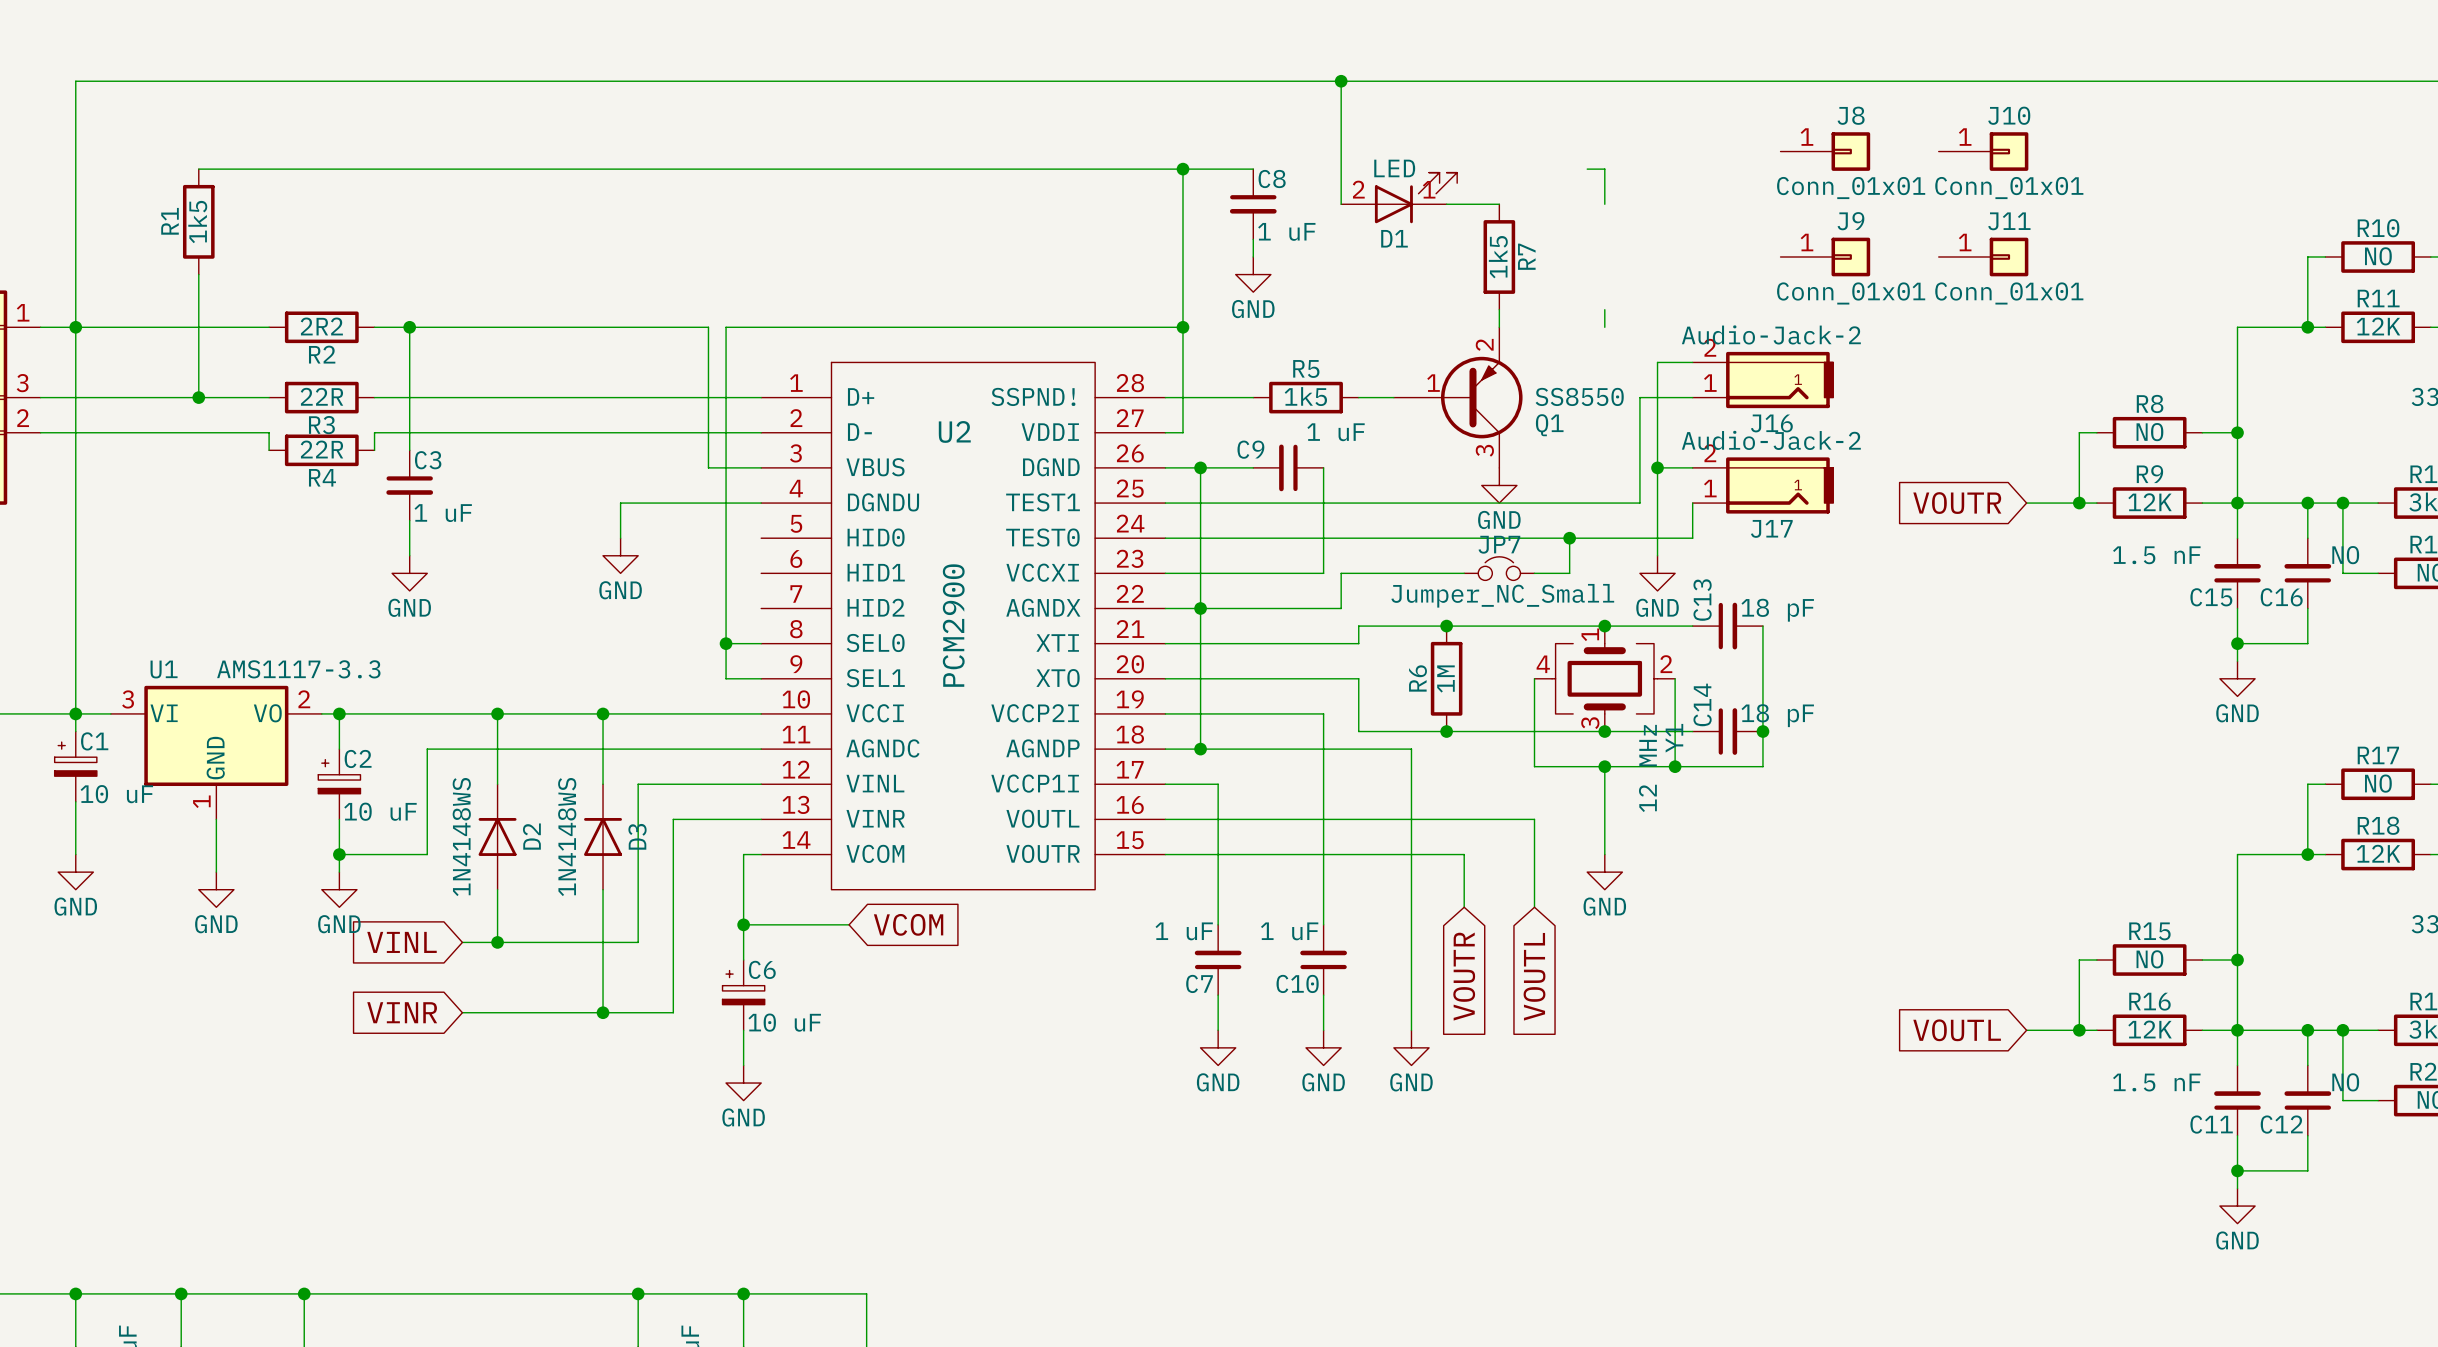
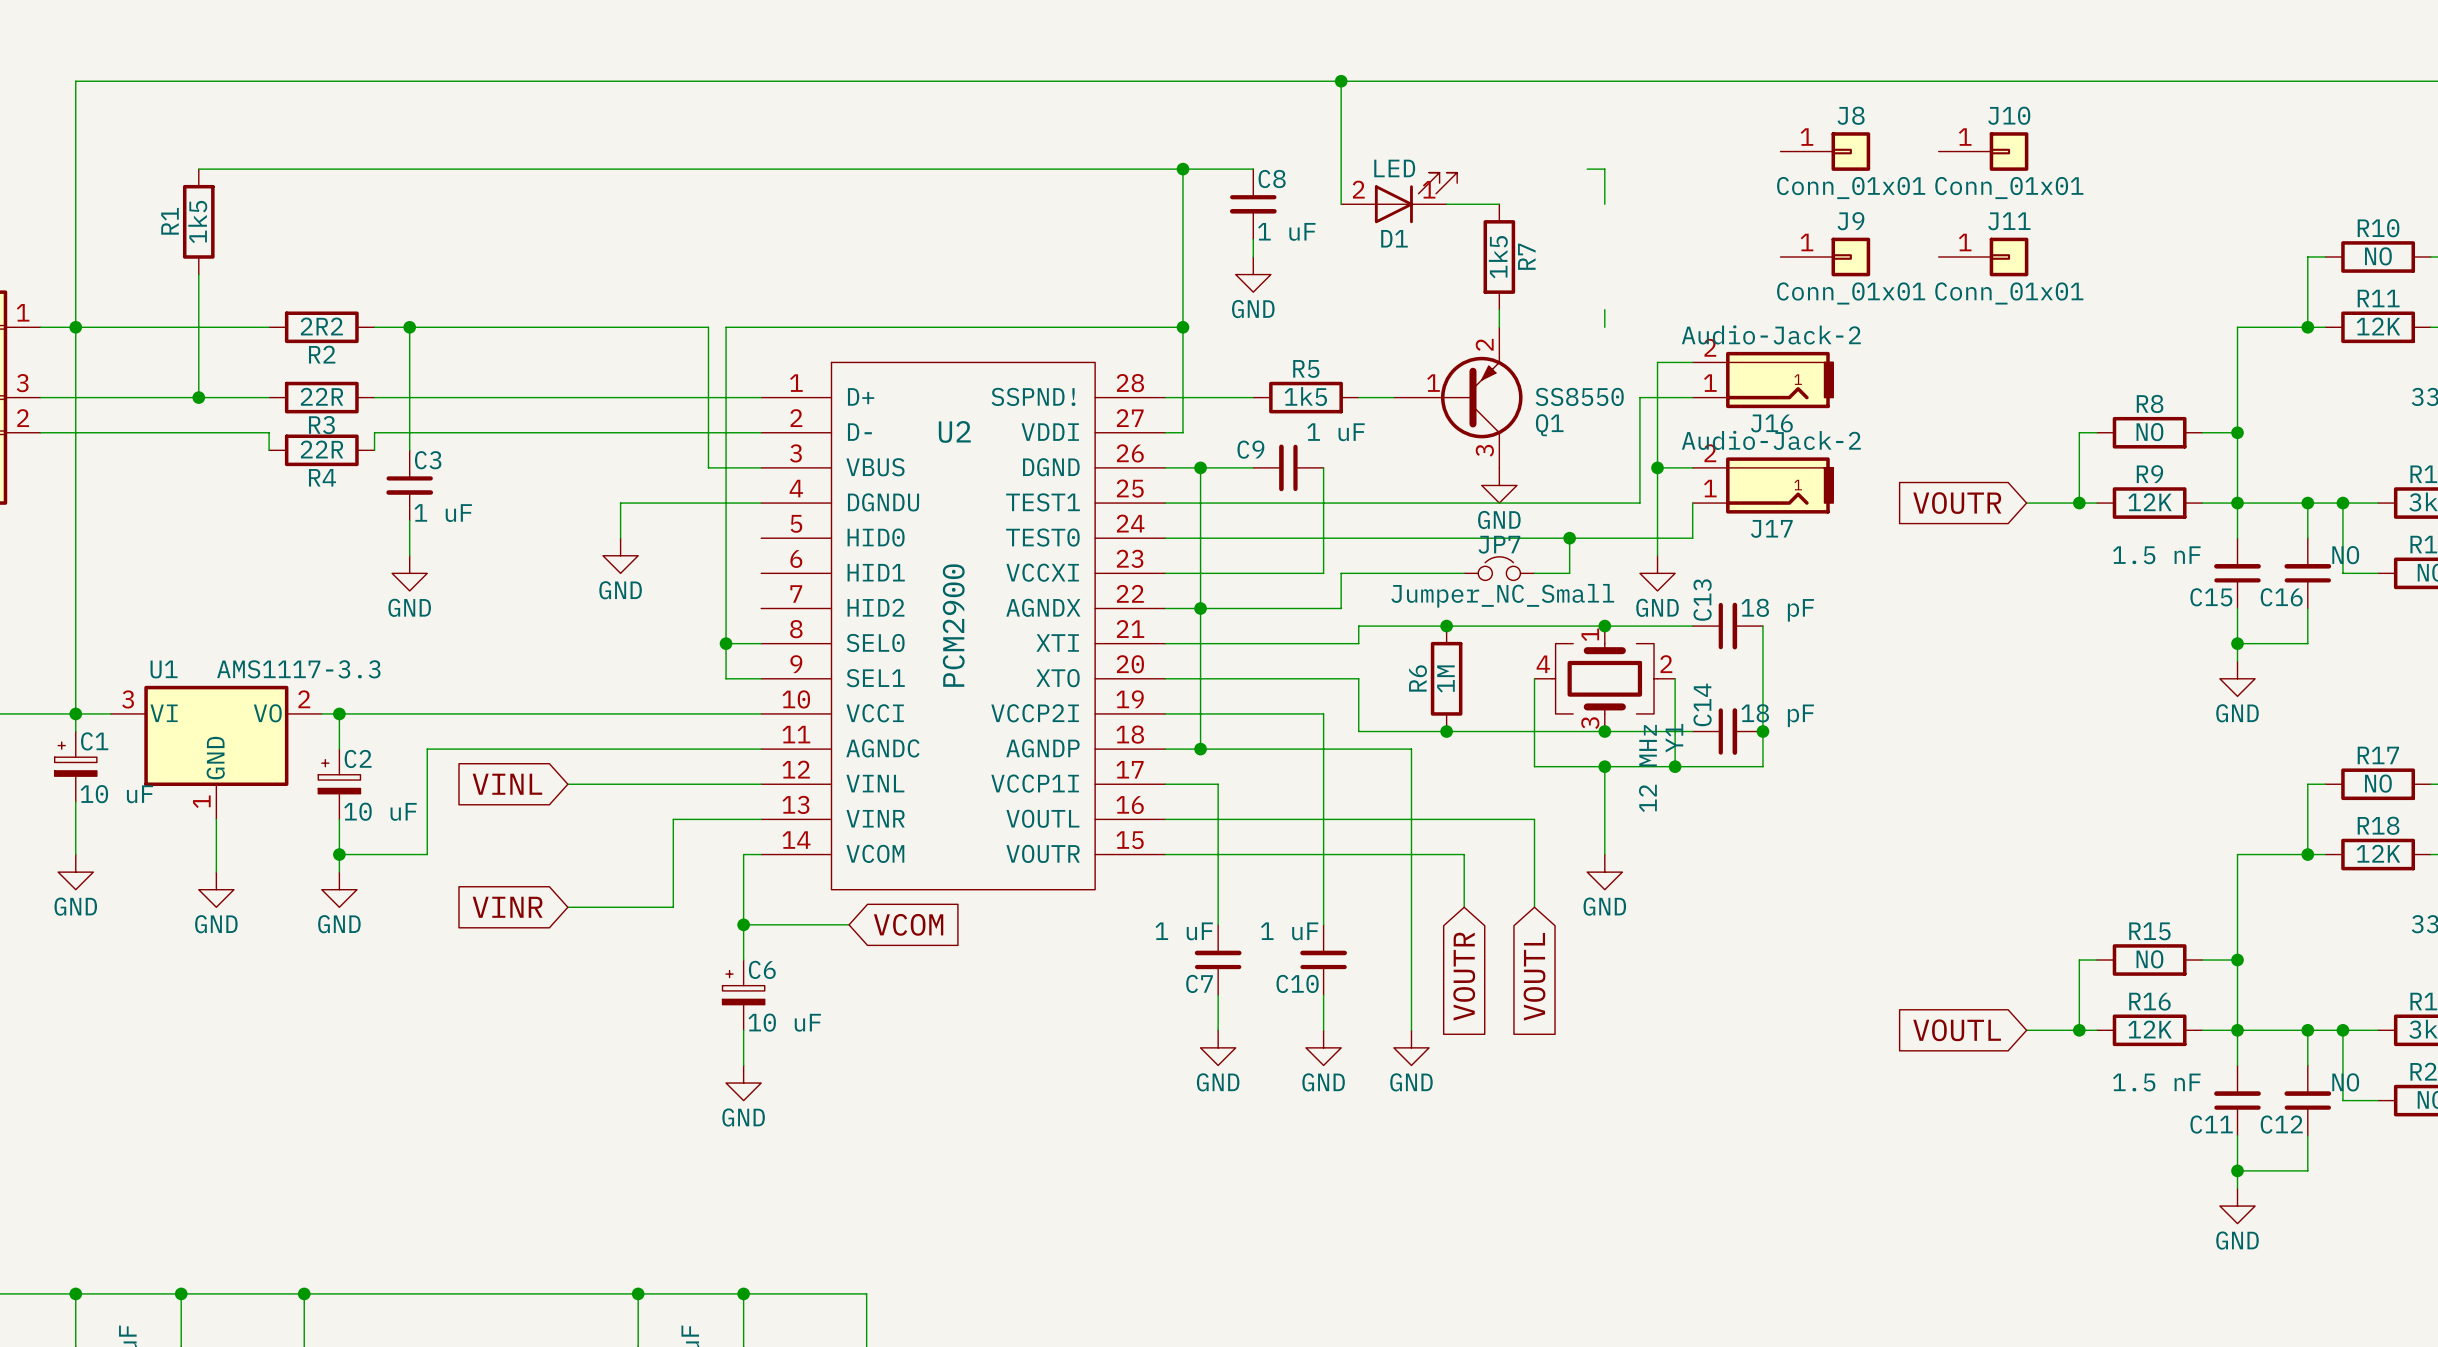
wire: (497, 713) (497, 784) -> none
junction: (497, 713) -> none
wire: (603, 713) (603, 784) -> none
junction: (603, 713) -> none
wire: (638, 784) (638, 942) (462, 942) -> (638, 784) (567, 784)
D2: 1N4148WS (497, 836) -> none
D3: 1N4148WS (603, 836) -> none
wire: (497, 889) (497, 942) -> none
wire: (603, 889) (603, 1012) -> none
wire: (673, 907) (673, 1012) (462, 1012) -> (673, 907) (567, 907)
global label position: VINL (401, 942) -> VINL (507, 784)
junction: (497, 942) -> none
global label position: VINR (402, 1012) -> VINR (507, 907)
junction: (603, 1012) -> none

